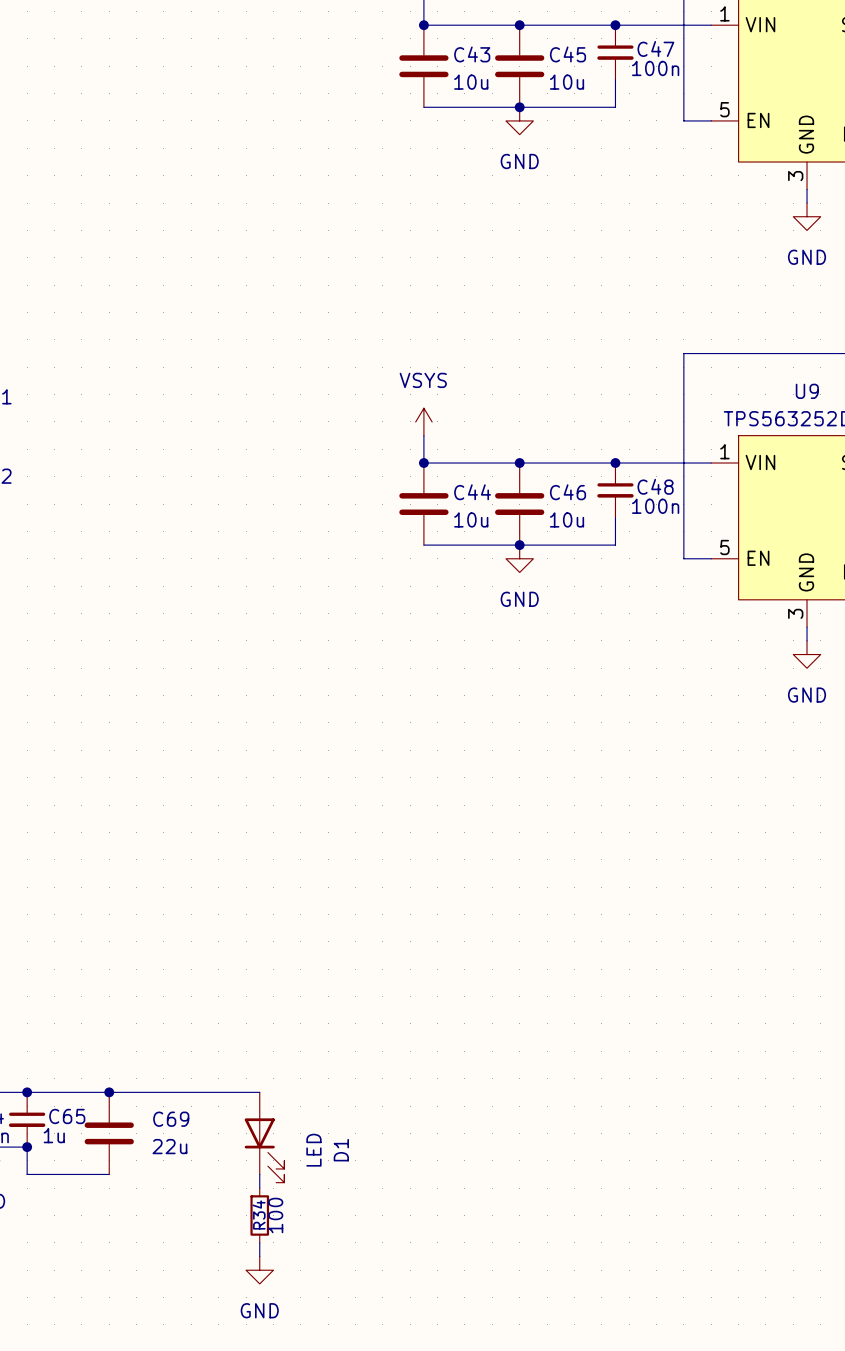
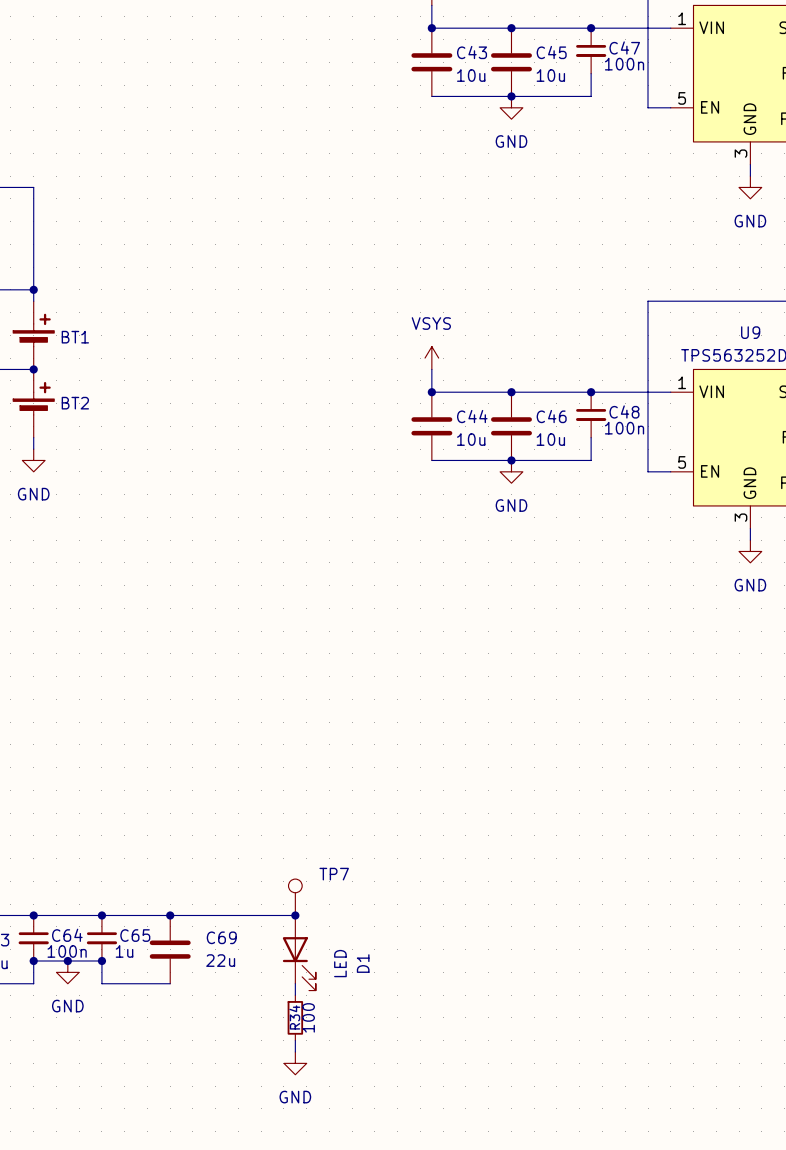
TP7: none -> (295, 897)
junction: none -> (295, 915)

